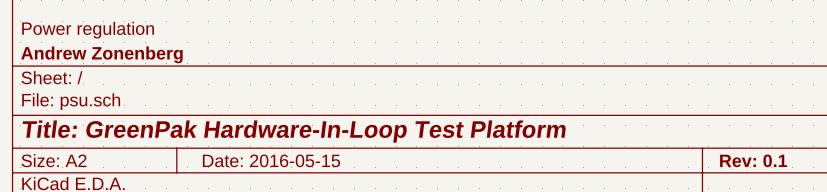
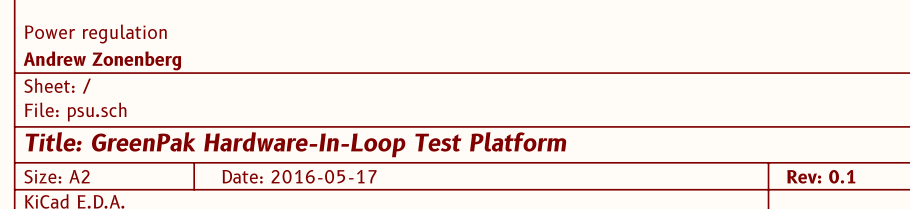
title block: Date: 2016-05-15 (271, 160) -> Date: 2016-05-17 (299, 176)

